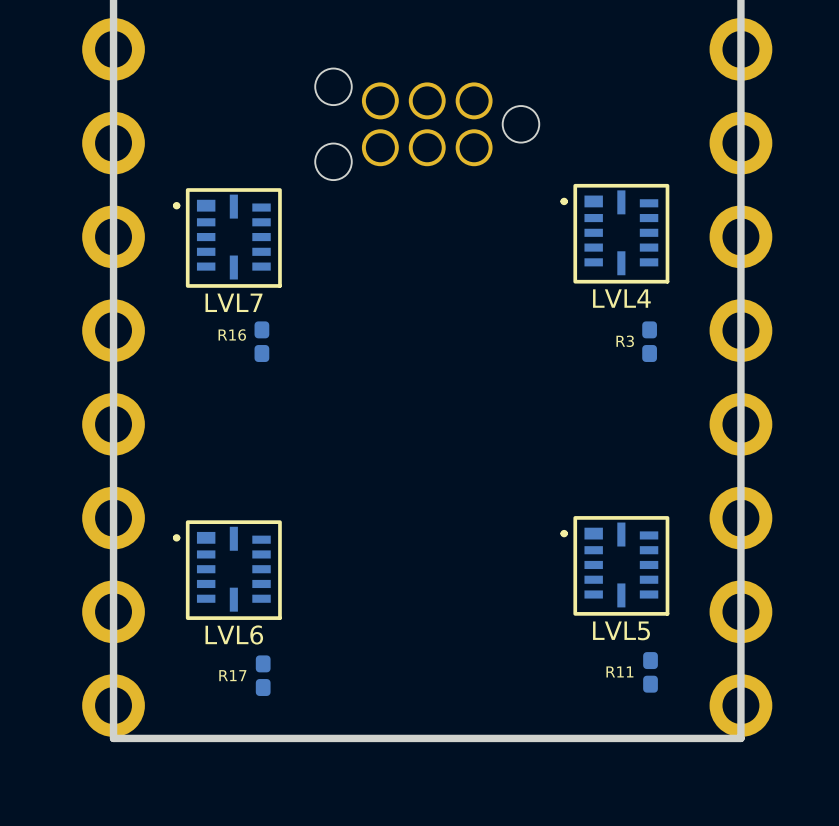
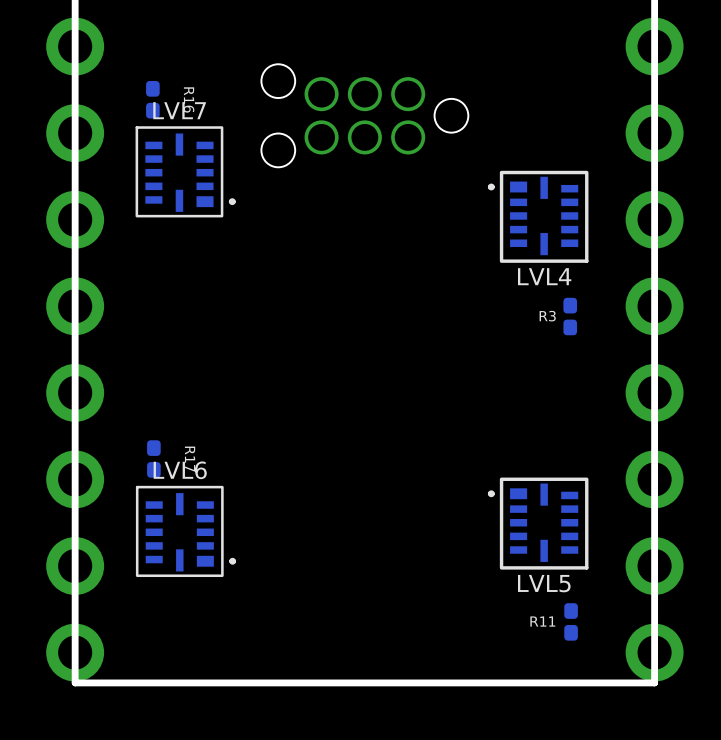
LVL7 footprint: [172, 188, 282, 288] -> [135, 126, 236, 218]
LVL7 name position: LVL7 (234, 302) -> LVL7 (179, 110)
R16 name rotation: 0° (232, 335) -> 90° clockwise (189, 99)
R16 name position: R16 (232, 335) -> R16 (189, 99)
R16 position: (261, 341) -> (152, 99)
LVL6 footprint: [172, 520, 282, 620] -> [135, 485, 237, 578]
LVL6 name position: LVL6 (234, 634) -> LVL6 (180, 470)
R17 name rotation: 0° (232, 675) -> 90° clockwise (190, 459)
R17 name position: R17 (232, 675) -> R17 (190, 459)
R17 position: (263, 675) -> (153, 459)

